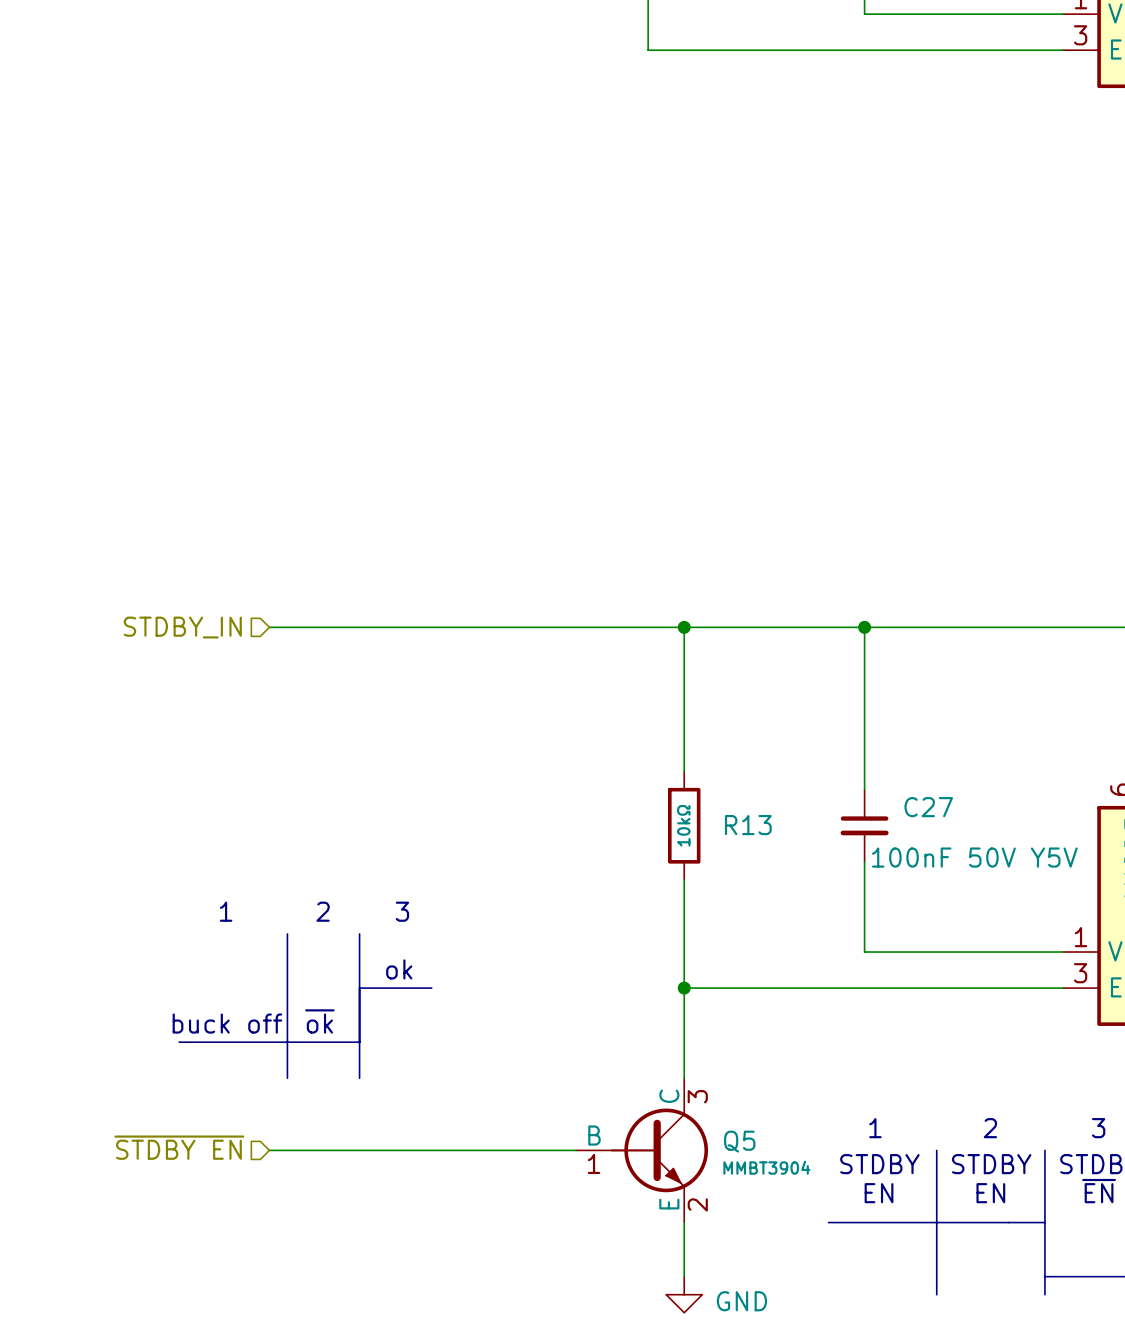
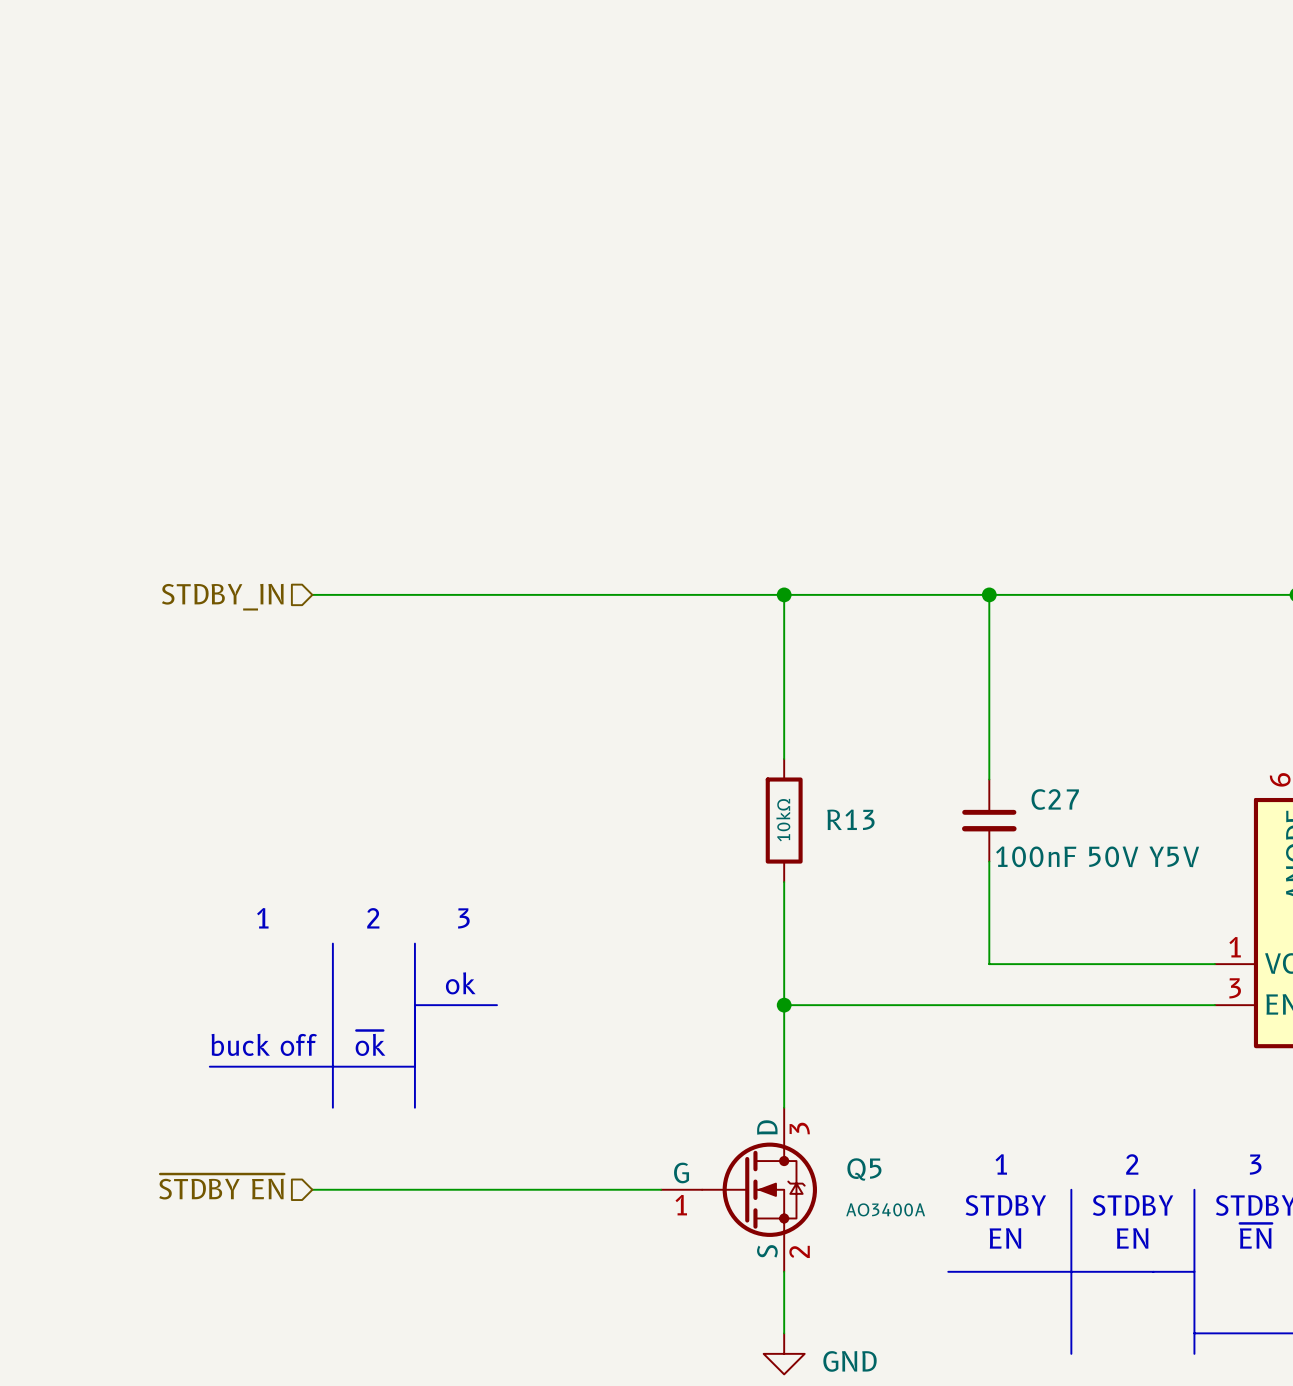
Q5 symbol: [576, 1078, 709, 1223] -> [661, 1107, 818, 1272]
Q5 value: MMBT3904 (766, 1167) -> AO3400A (885, 1209)

